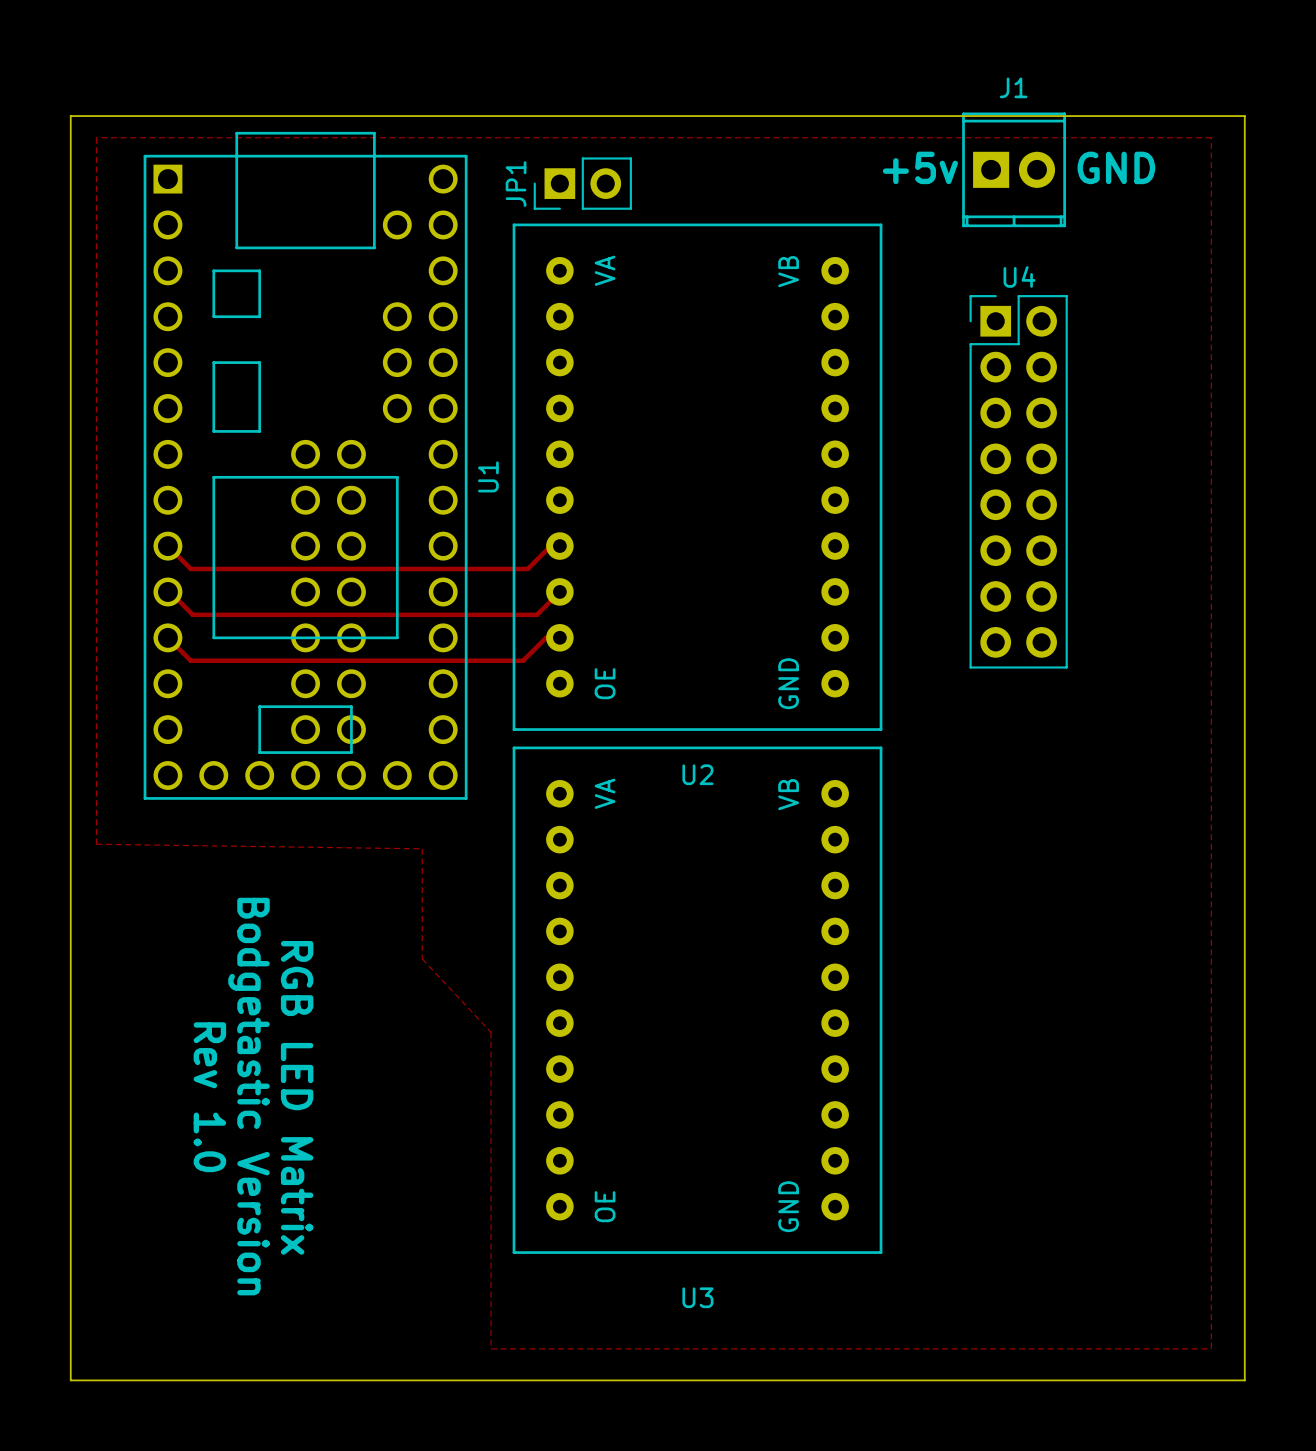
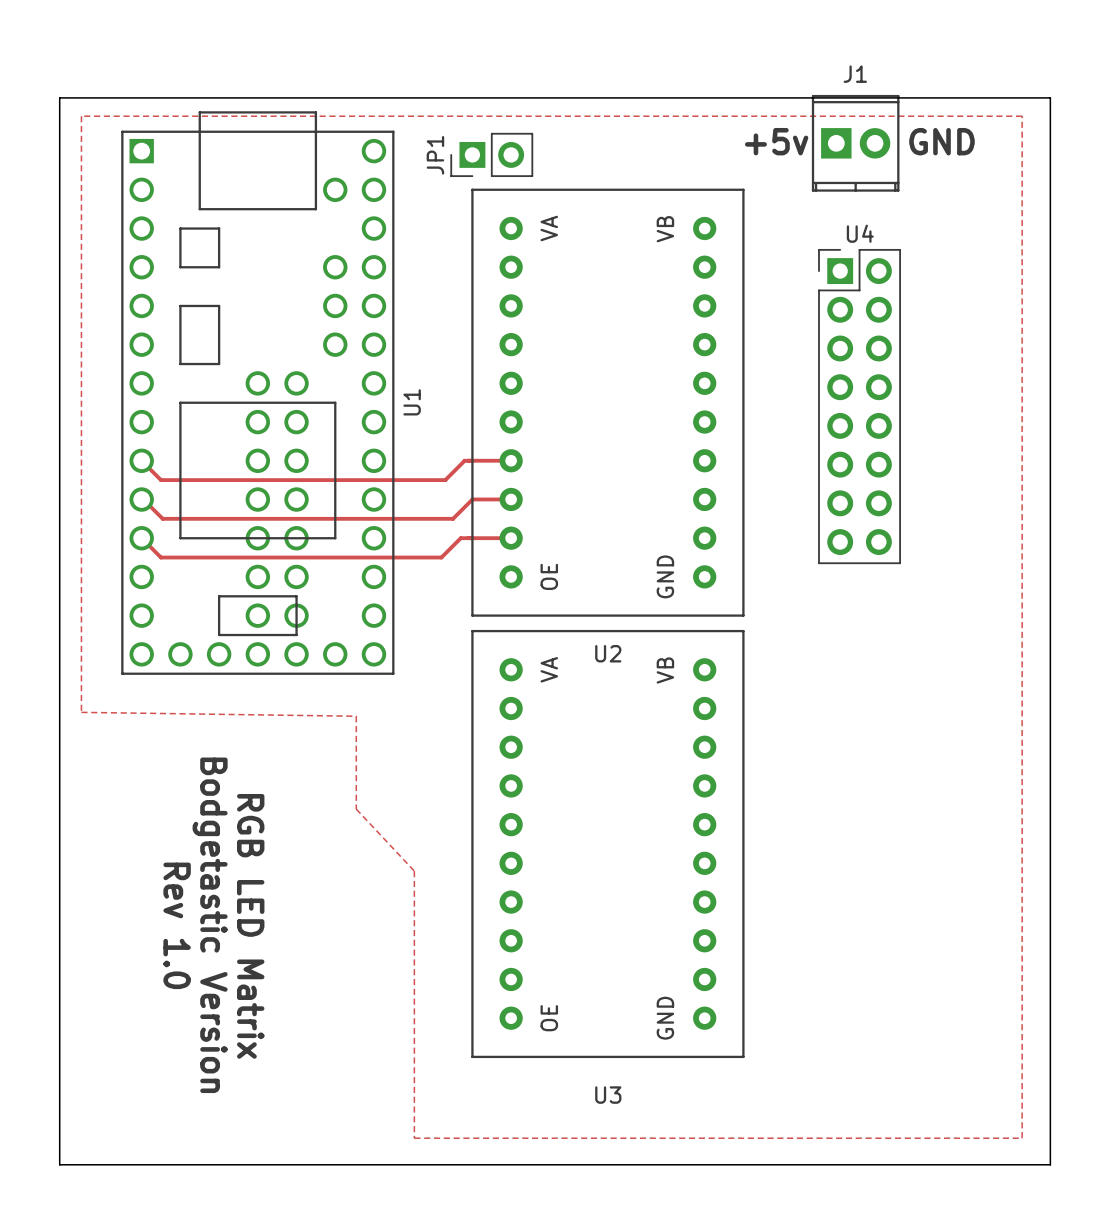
U2 footprint: [512, 223, 883, 731] -> [471, 188, 745, 617]
track: none -> (472, 460) (511, 460)
track: none -> (472, 499) (511, 499)
track: none -> (472, 538) (511, 538)
U3 footprint: [512, 746, 883, 1254] -> [471, 629, 745, 1059]

